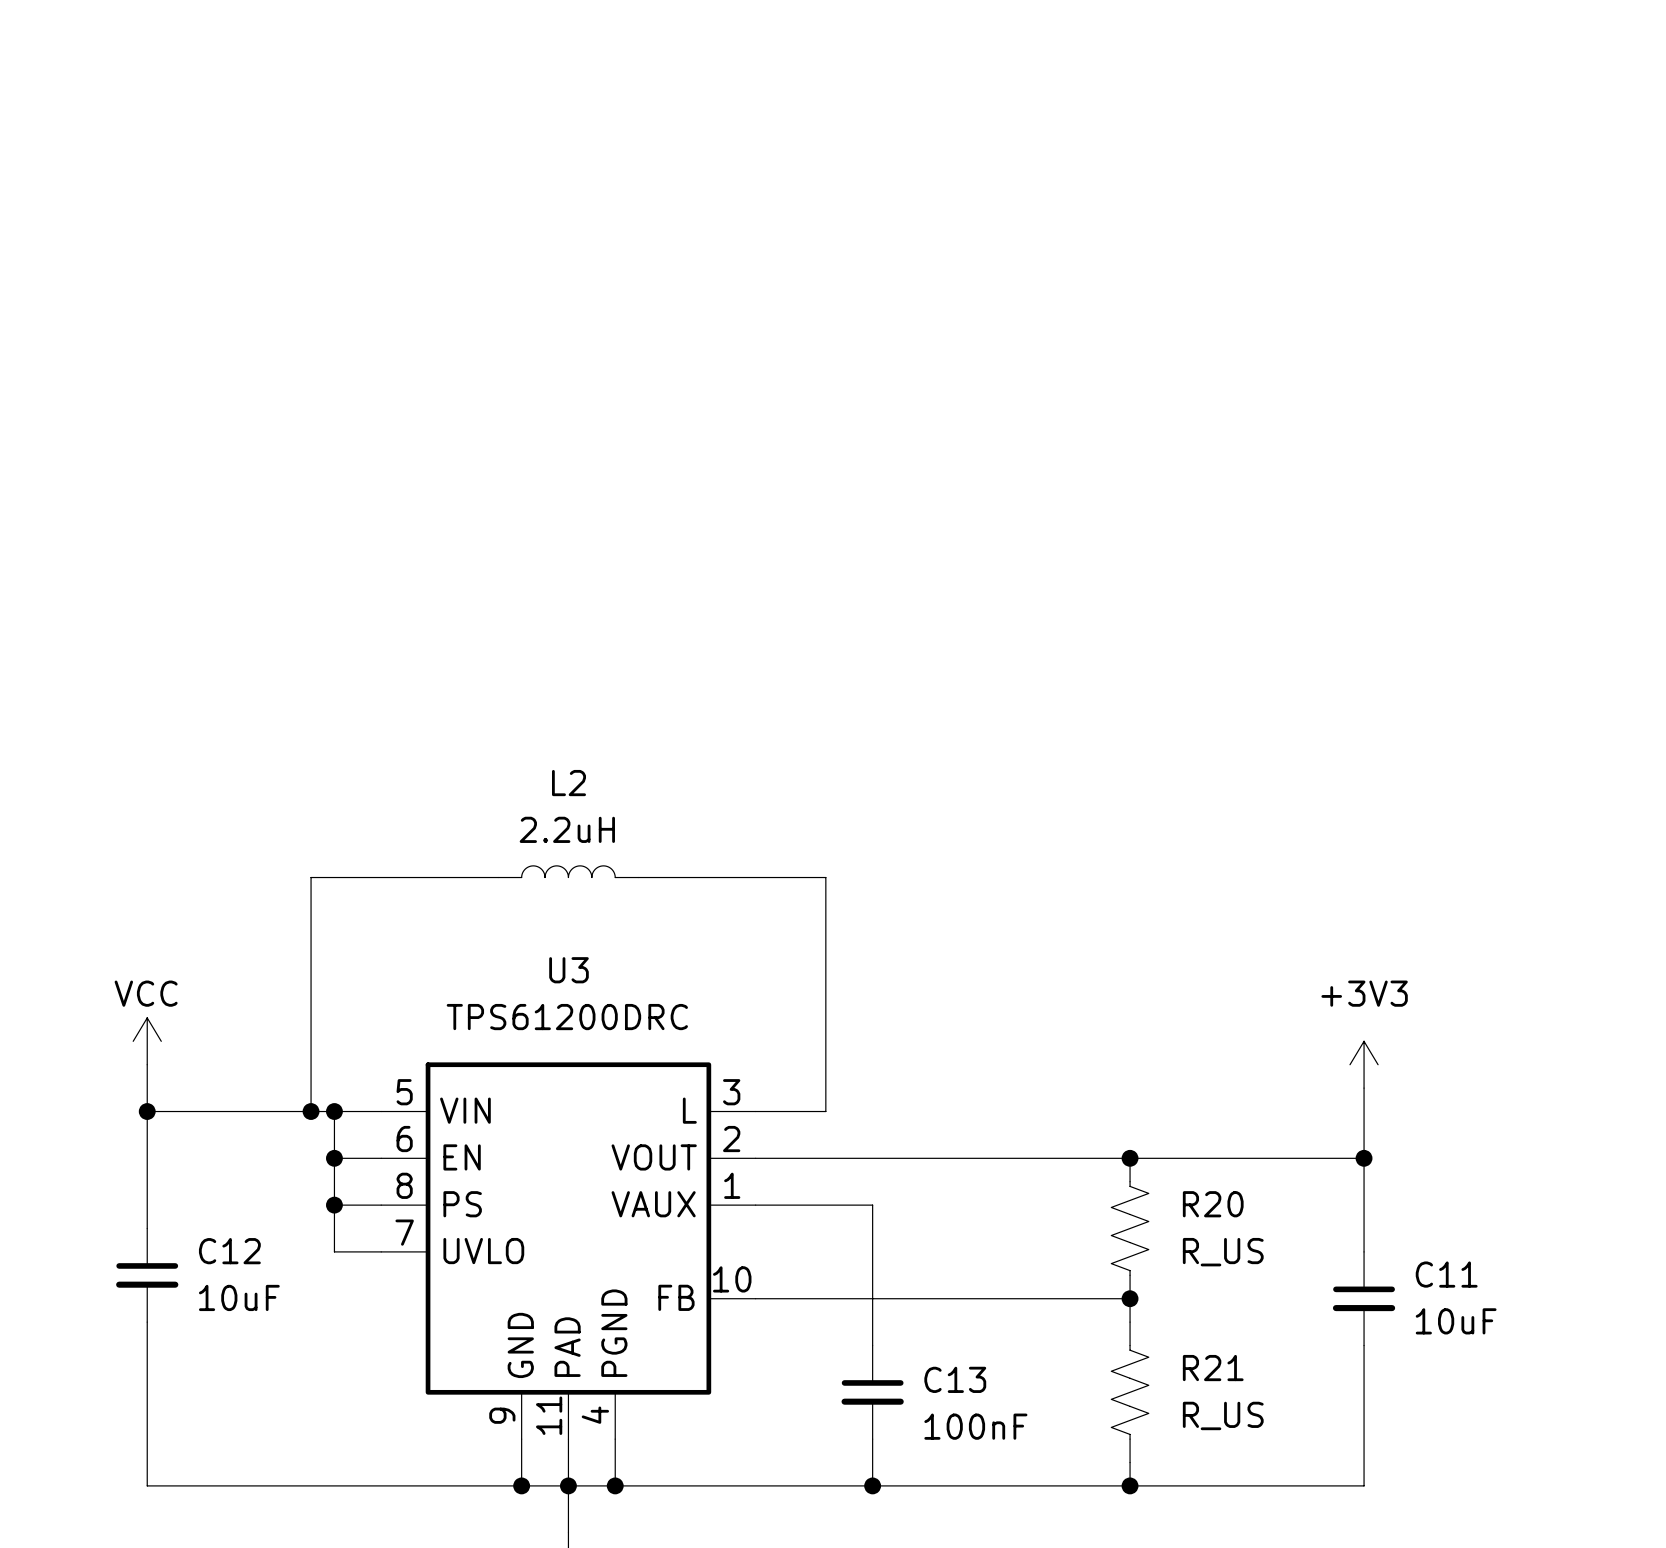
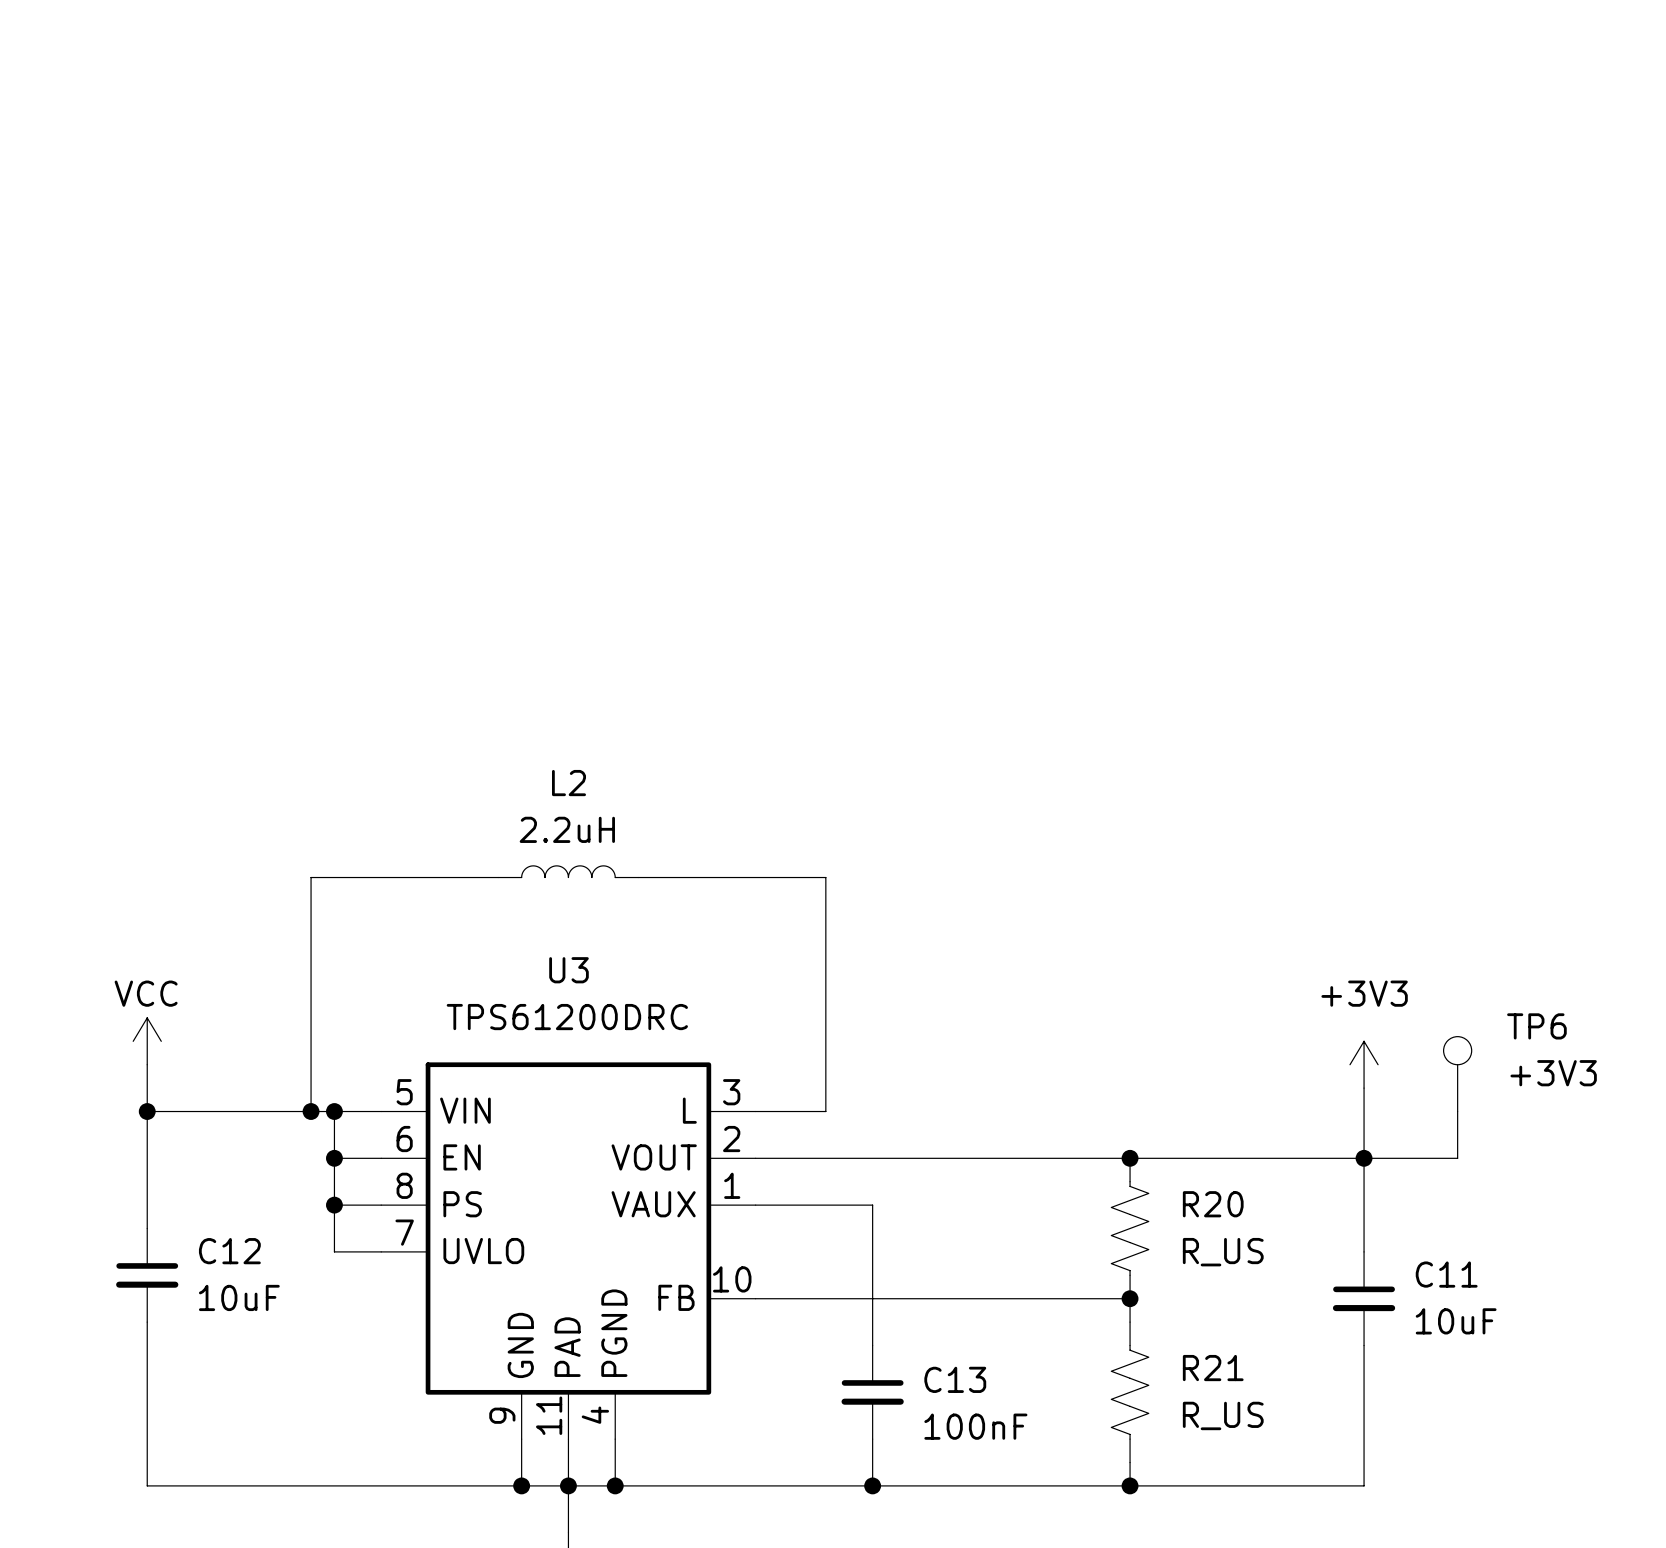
TP6: none -> +3V3 (1457, 1074)
wire: none -> (1457, 1111) (1457, 1158) (1364, 1158)

